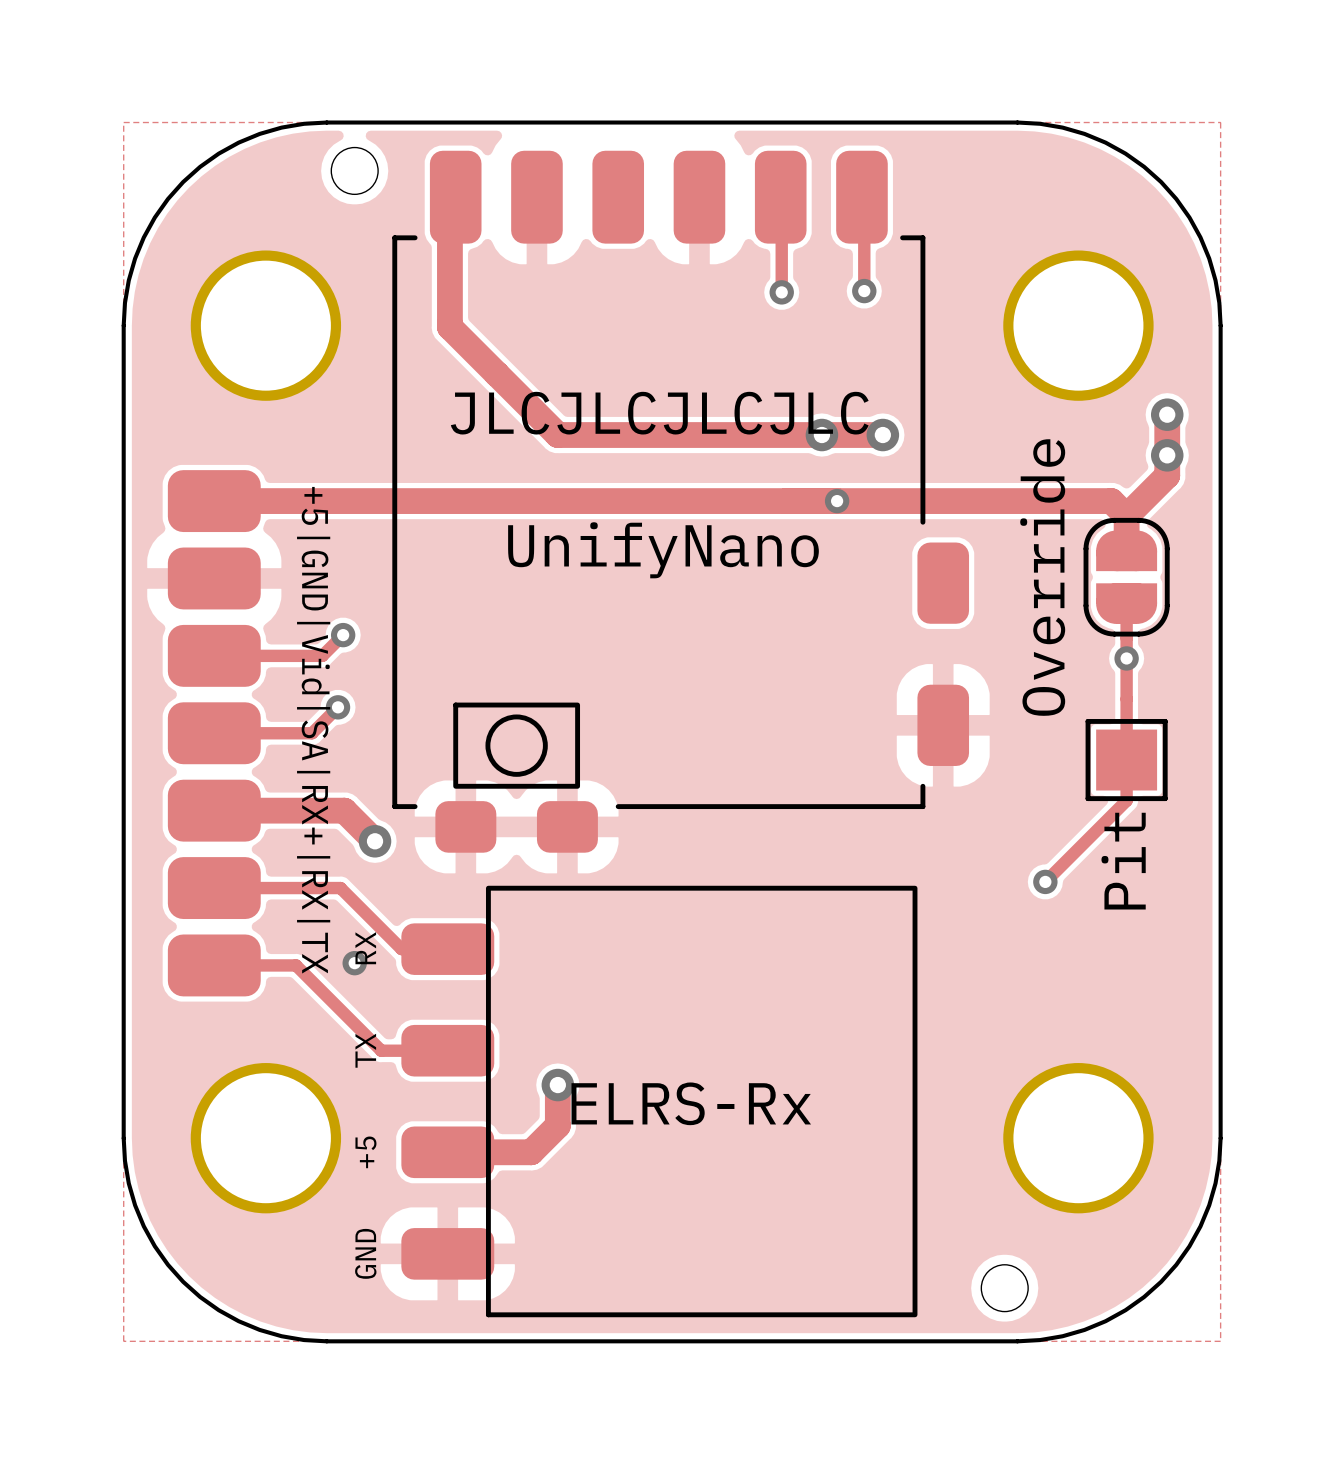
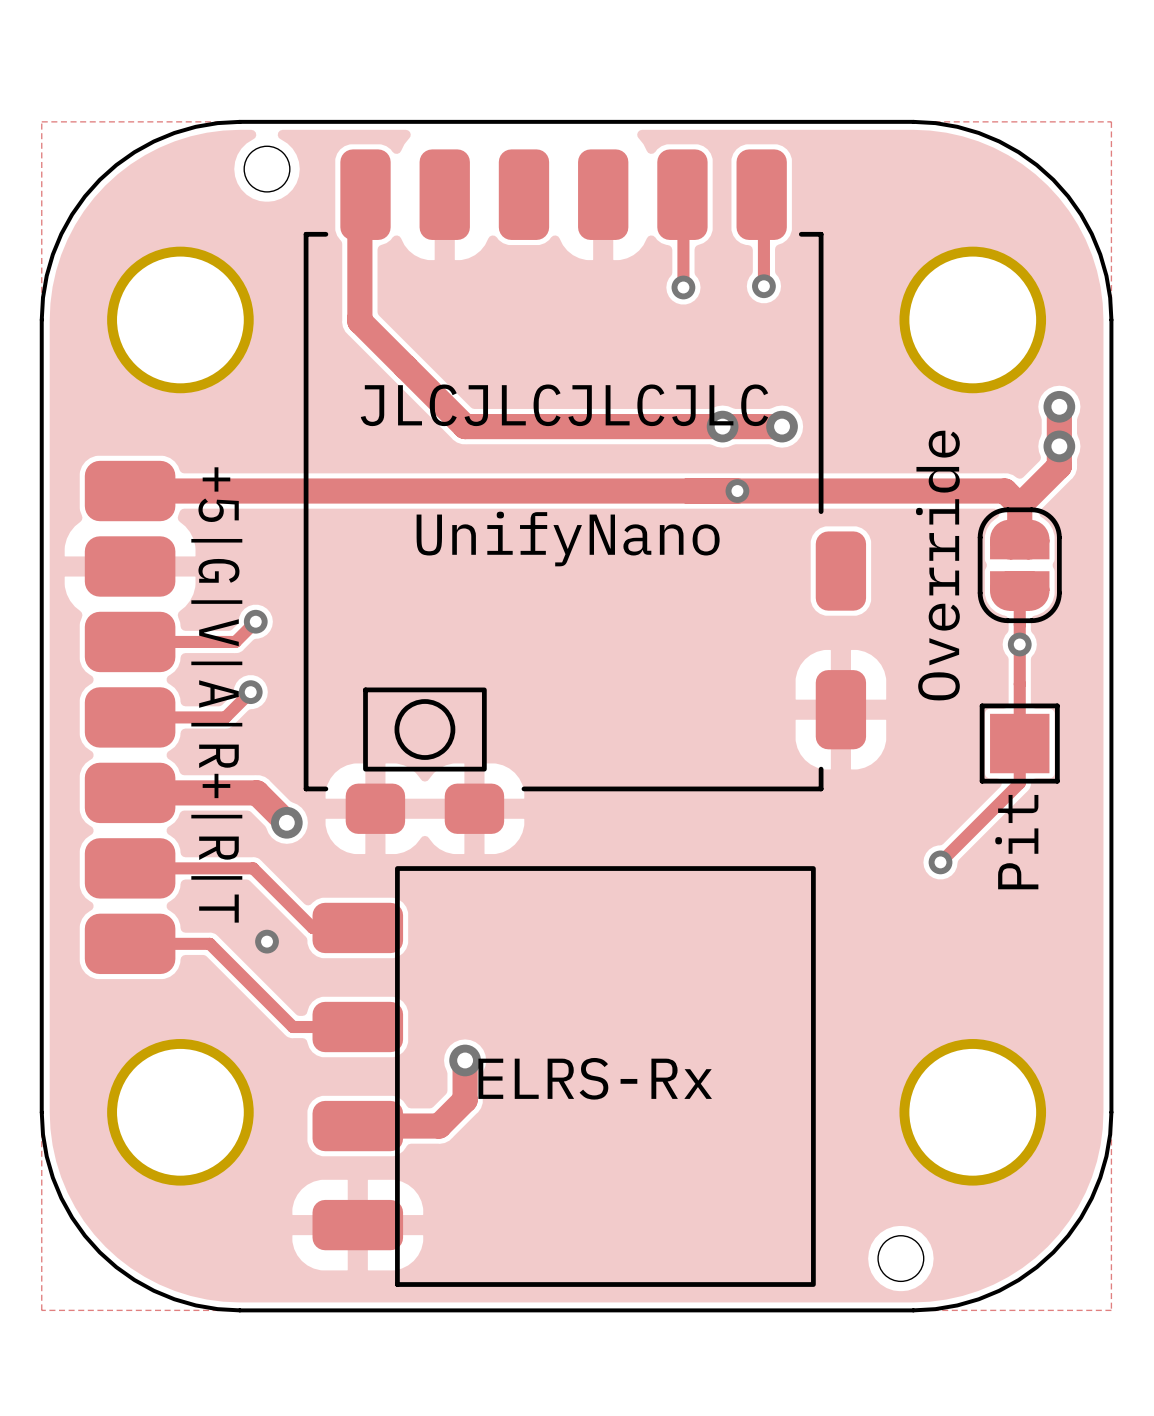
text: +5|GND|Vid|SA|RX+|RX|TX (313, 730) -> +5|G|V|A|R+|R|T (216, 694)
part text: RX (365, 948) -> none
part text: TX (365, 1050) -> none
part text: +5 (365, 1152) -> none
part text: GND (365, 1253) -> none

